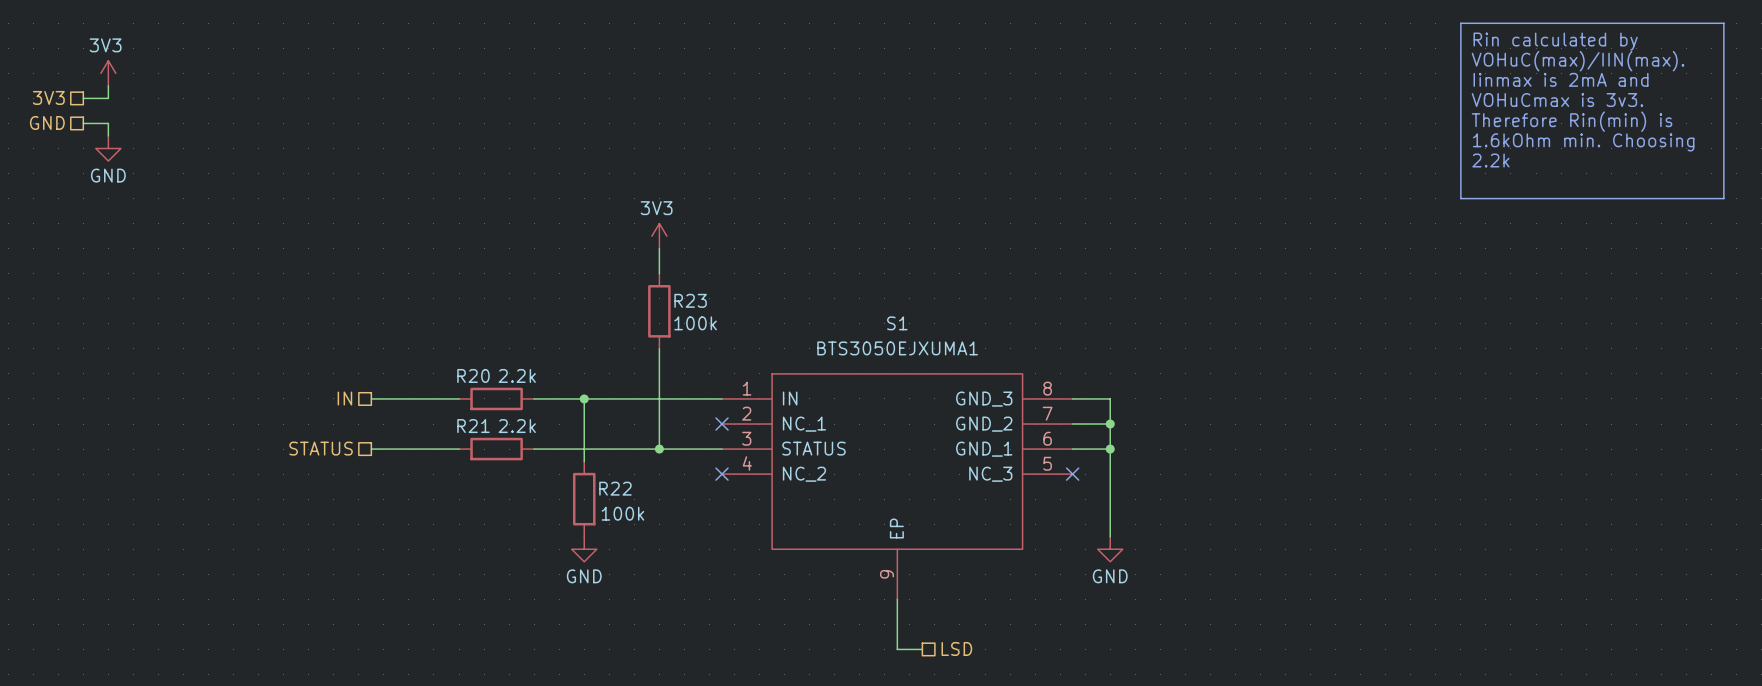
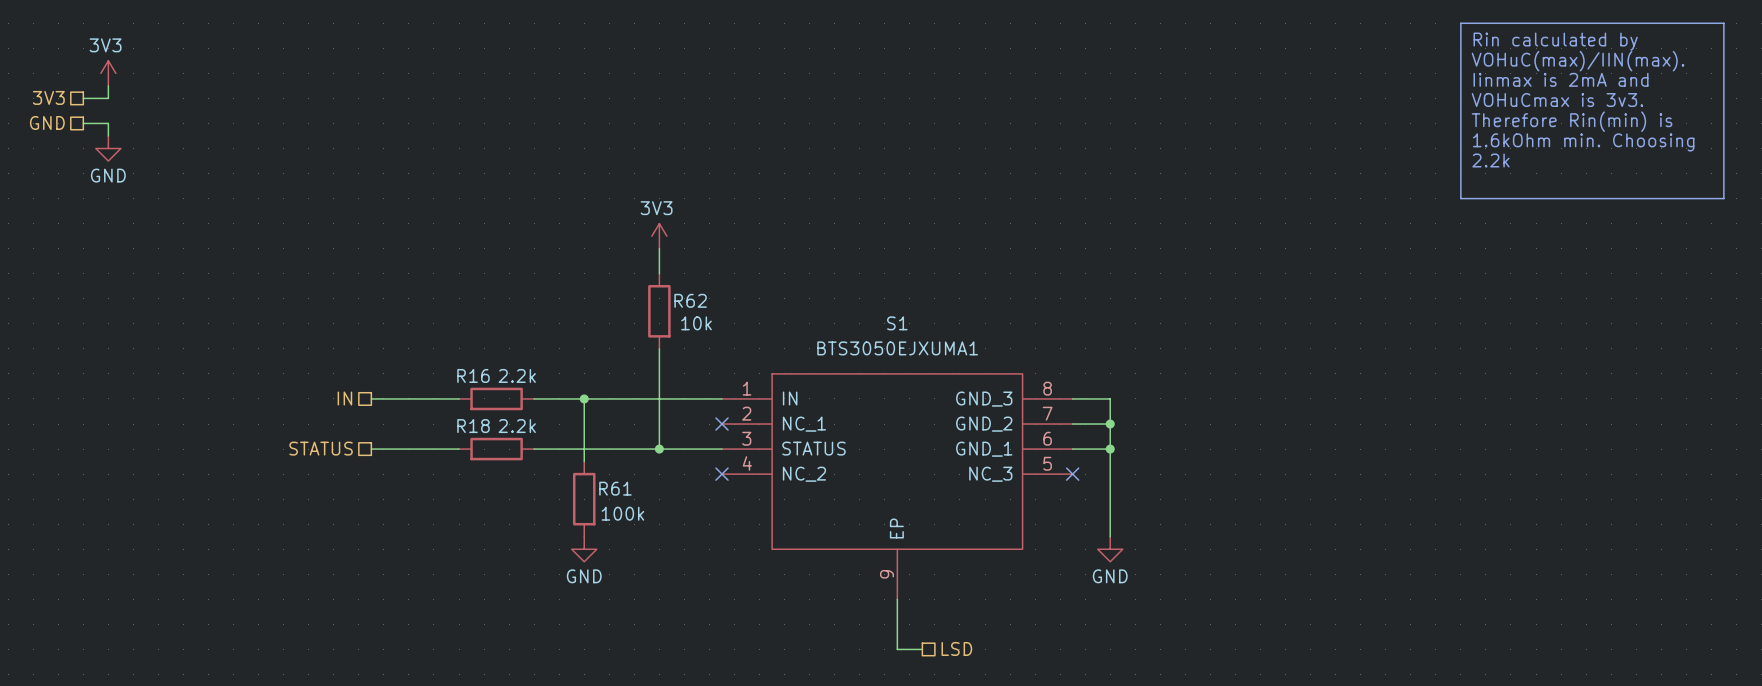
R23 name: R23 (690, 300) -> R62 (690, 300)
R23 value: 100k (695, 323) -> 10k (696, 323)
R20 name: R20 (473, 375) -> R16 (473, 375)
R21 name: R21 (473, 426) -> R18 (473, 426)
R22 name: R22 (615, 488) -> R61 (615, 488)

